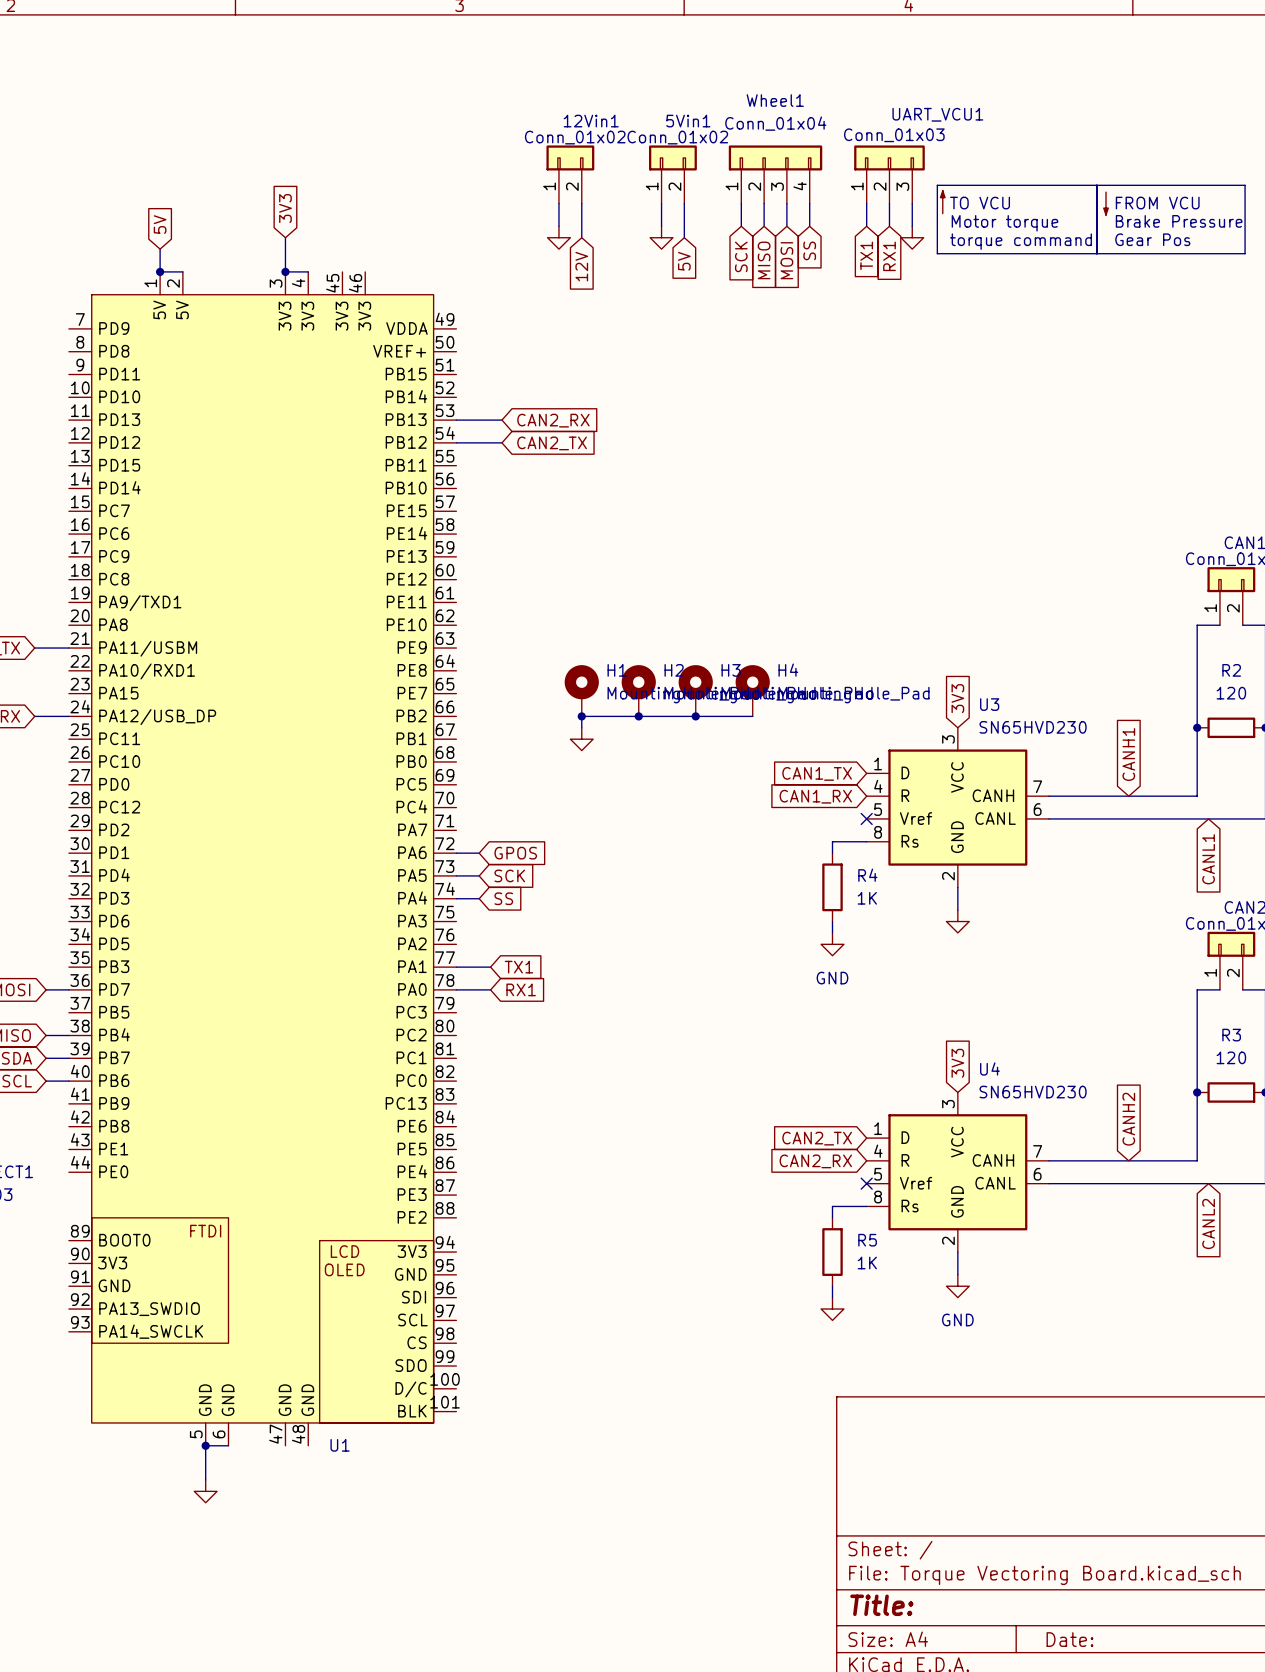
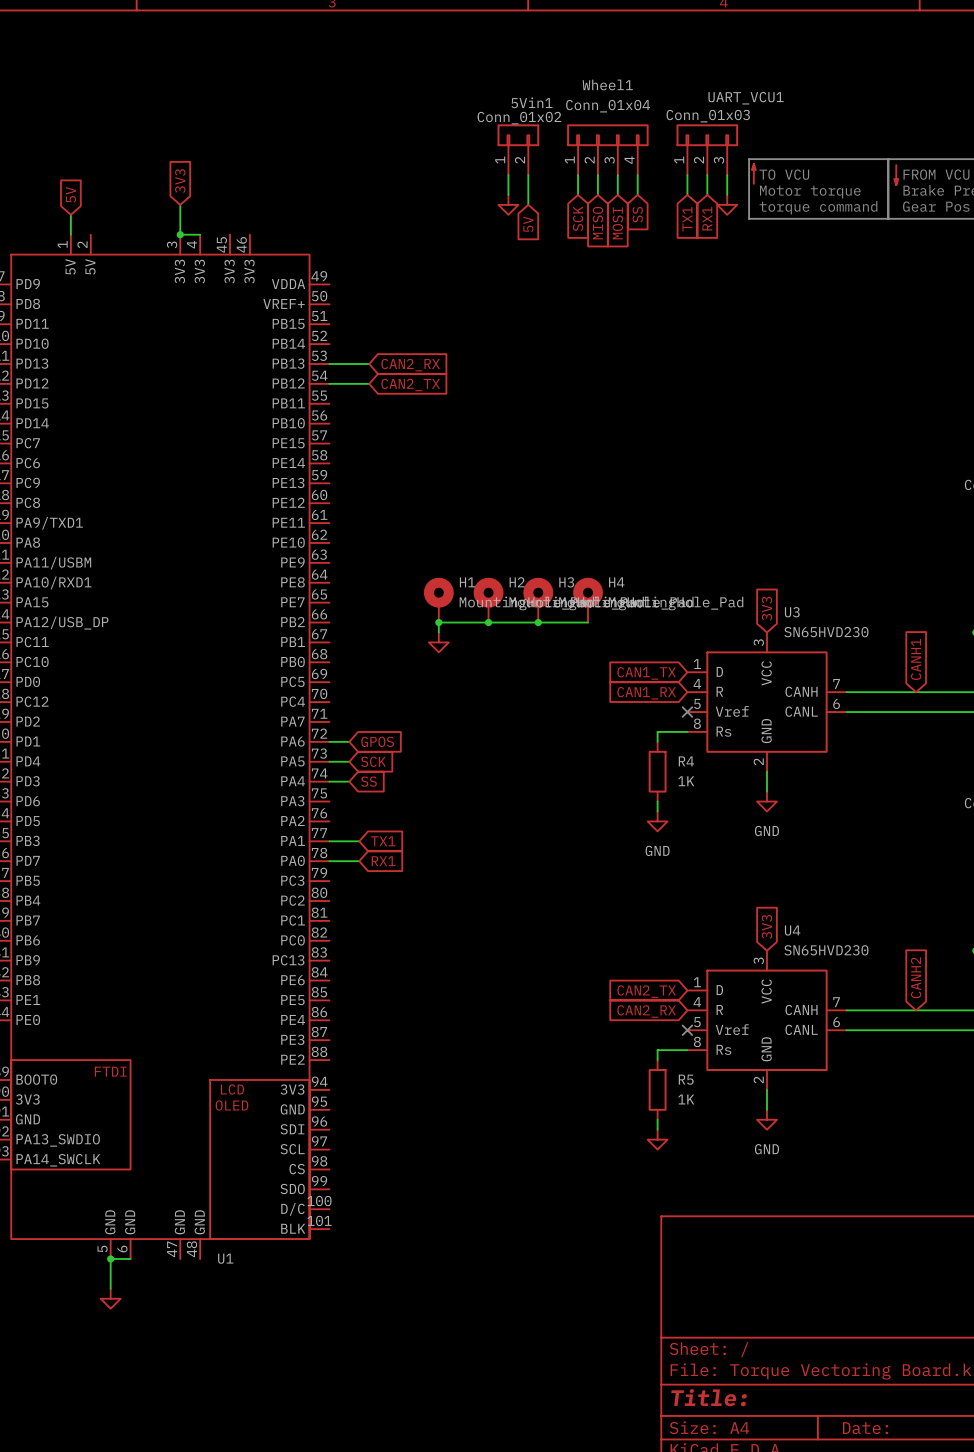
12Vin1: Conn_01x02 (570, 174) -> none
wire: (558, 203) (558, 226) -> none
wire: (581, 203) (581, 237) -> none
power symbol: (558, 237) -> none
global label: 12V (581, 266) -> none
wire: (160, 271) (182, 271) -> none
junction: (160, 271) -> none
power symbol text: none -> GND (766, 831)

